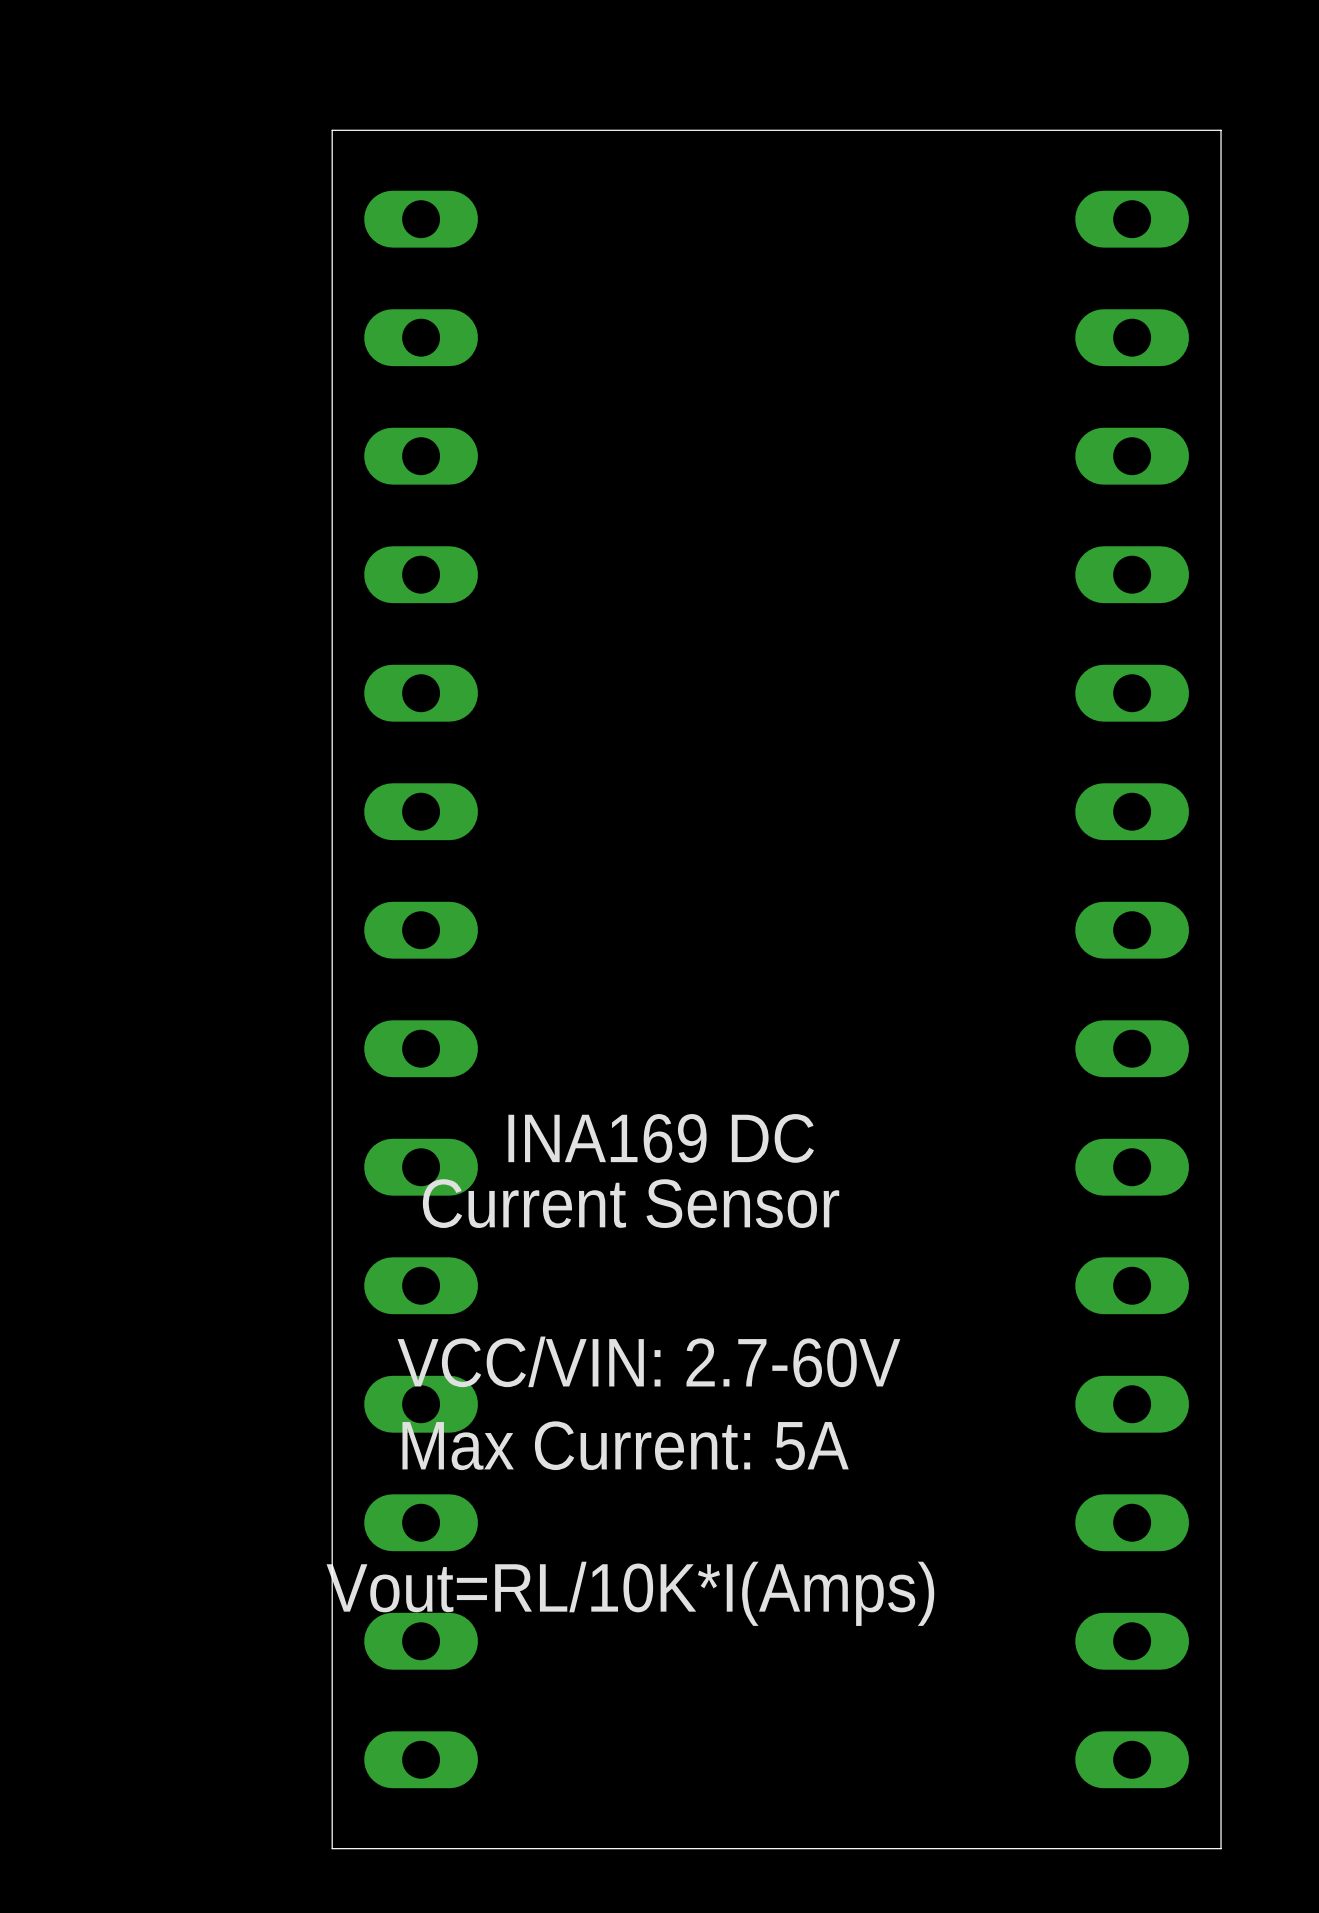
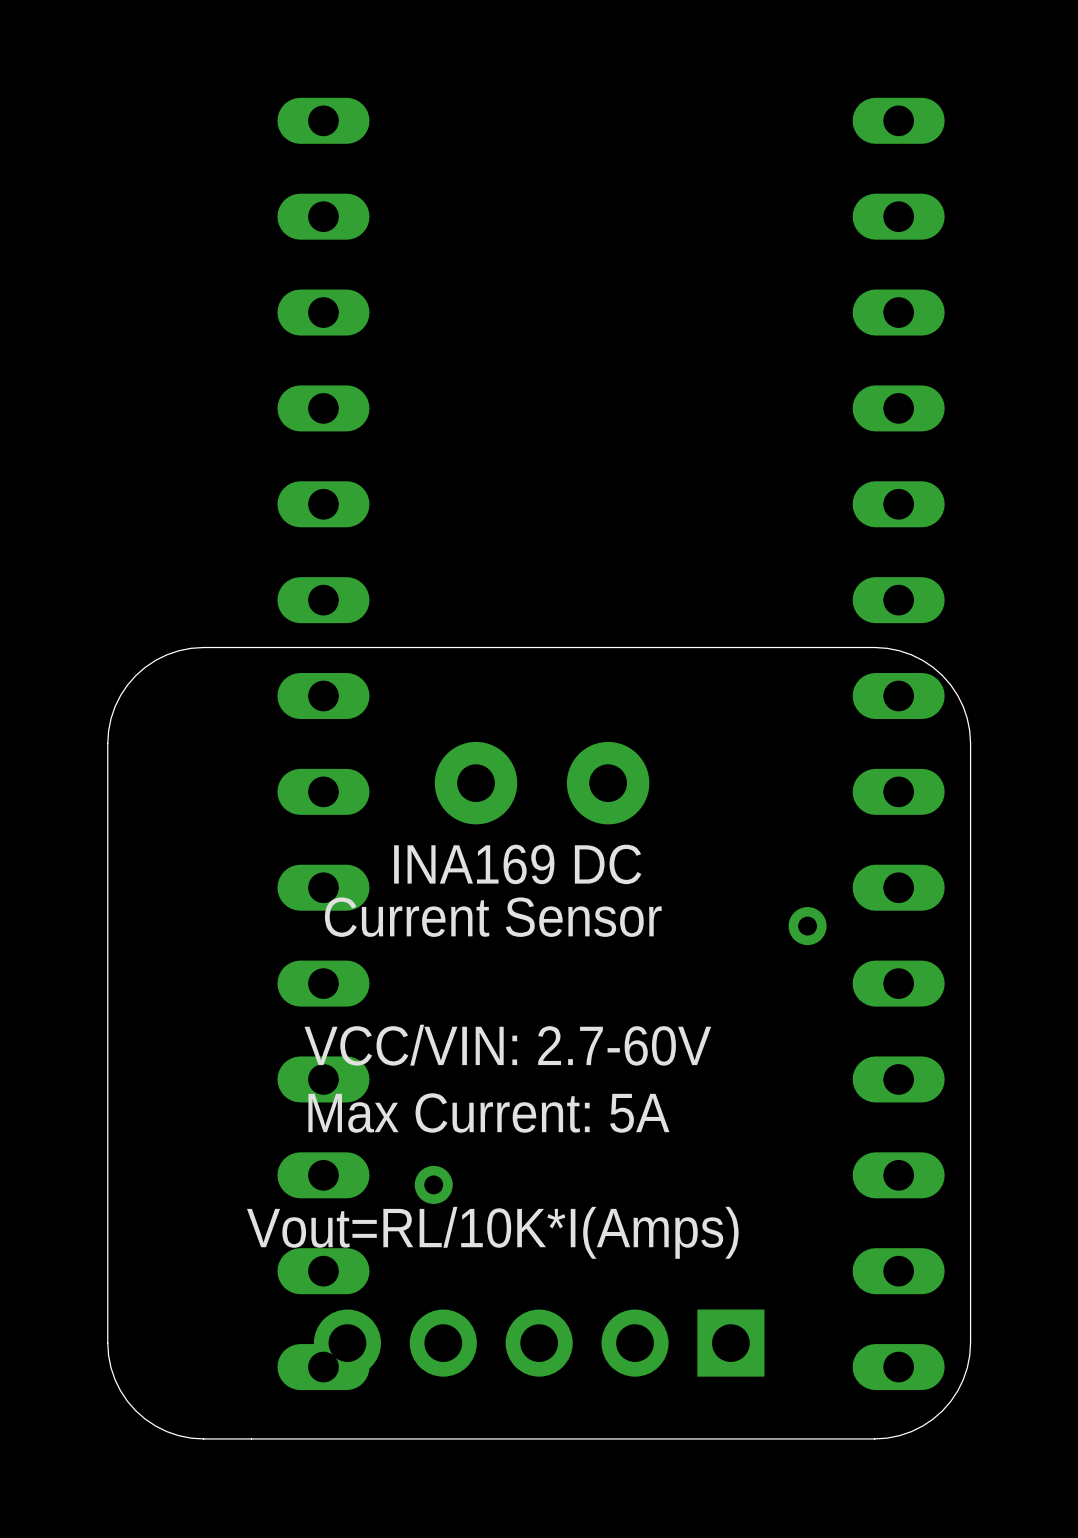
board edge: (1221, 988) (1221, 130) (332, 130) (332, 1848) -> (970, 743) (967, 718) (963, 706) (950, 685) (942, 675) (933, 667) (911, 654) (887, 648) (203, 647) (178, 650) (166, 654) (145, 667) (135, 675) (127, 685) (115, 706) (111, 718) (107, 743) (108, 1355) (115, 1379) (127, 1401) (135, 1410) (155, 1426) (178, 1435) (191, 1438) (251, 1438)
part: none -> (542, 783)
via: none -> (807, 926)
via: none -> (433, 1184)
part: none -> (539, 1343)
board edge: (1221, 1730) (1221, 1848) (1102, 1848) -> (970, 1343) (967, 1367) (963, 1379) (950, 1401) (942, 1410) (933, 1419) (911, 1431) (899, 1435) (874, 1438)

